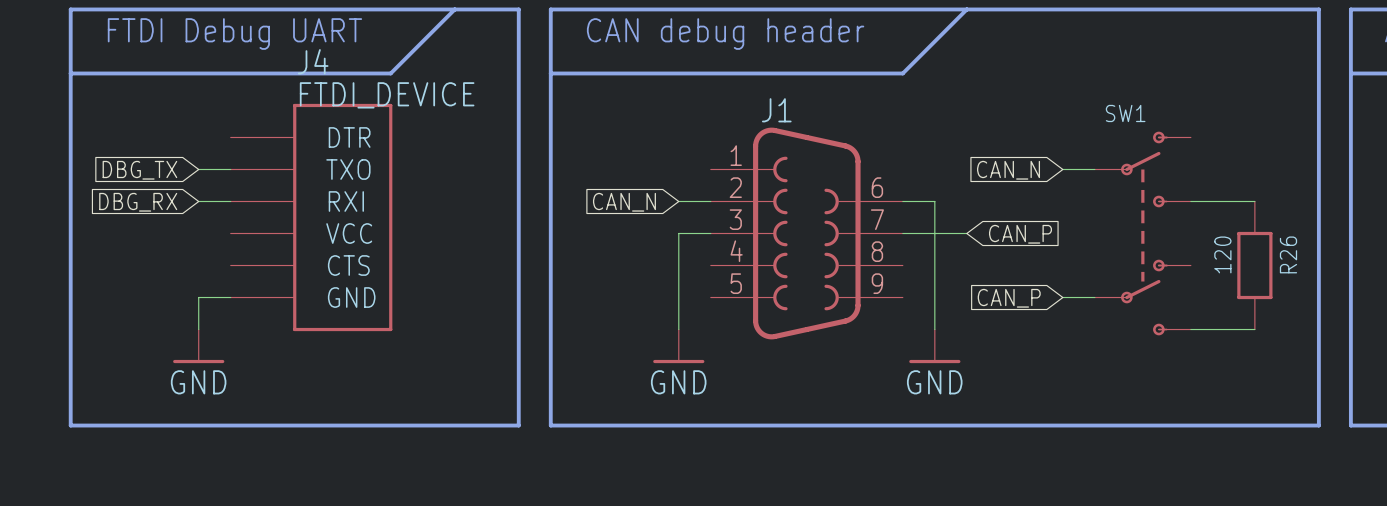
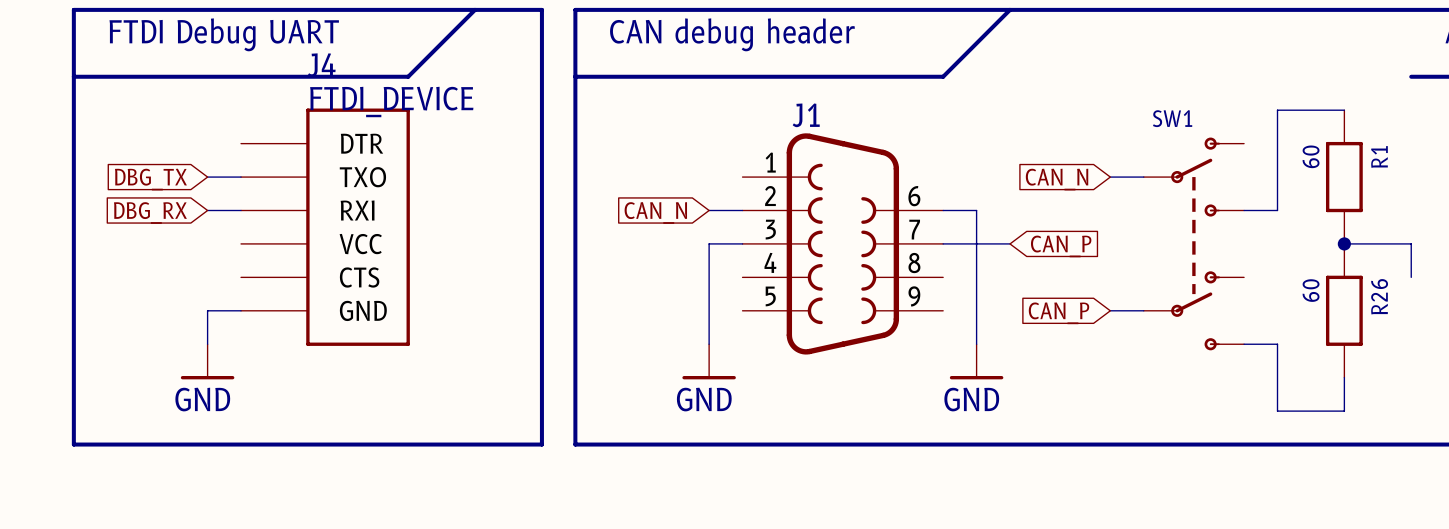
line: (1318, 9) (1318, 425) -> (1377, 9) (1411, 9)
line: (1350, 9) (1350, 425) -> (1377, 444) (1411, 444)
R1: none -> 60 (1344, 177)
wire: (1222, 201) (1254, 201) -> (1277, 210) (1277, 110) (1344, 110)
wire: none -> (1344, 243) (1411, 243) (1411, 277)
junction: none -> (1344, 243)
R26 value: 120 (1222, 254) -> 60 (1311, 290)
R26 position: (1254, 265) -> (1344, 310)
wire: (1222, 329) (1254, 329) -> (1277, 344) (1277, 411) (1344, 411) (1344, 377)

